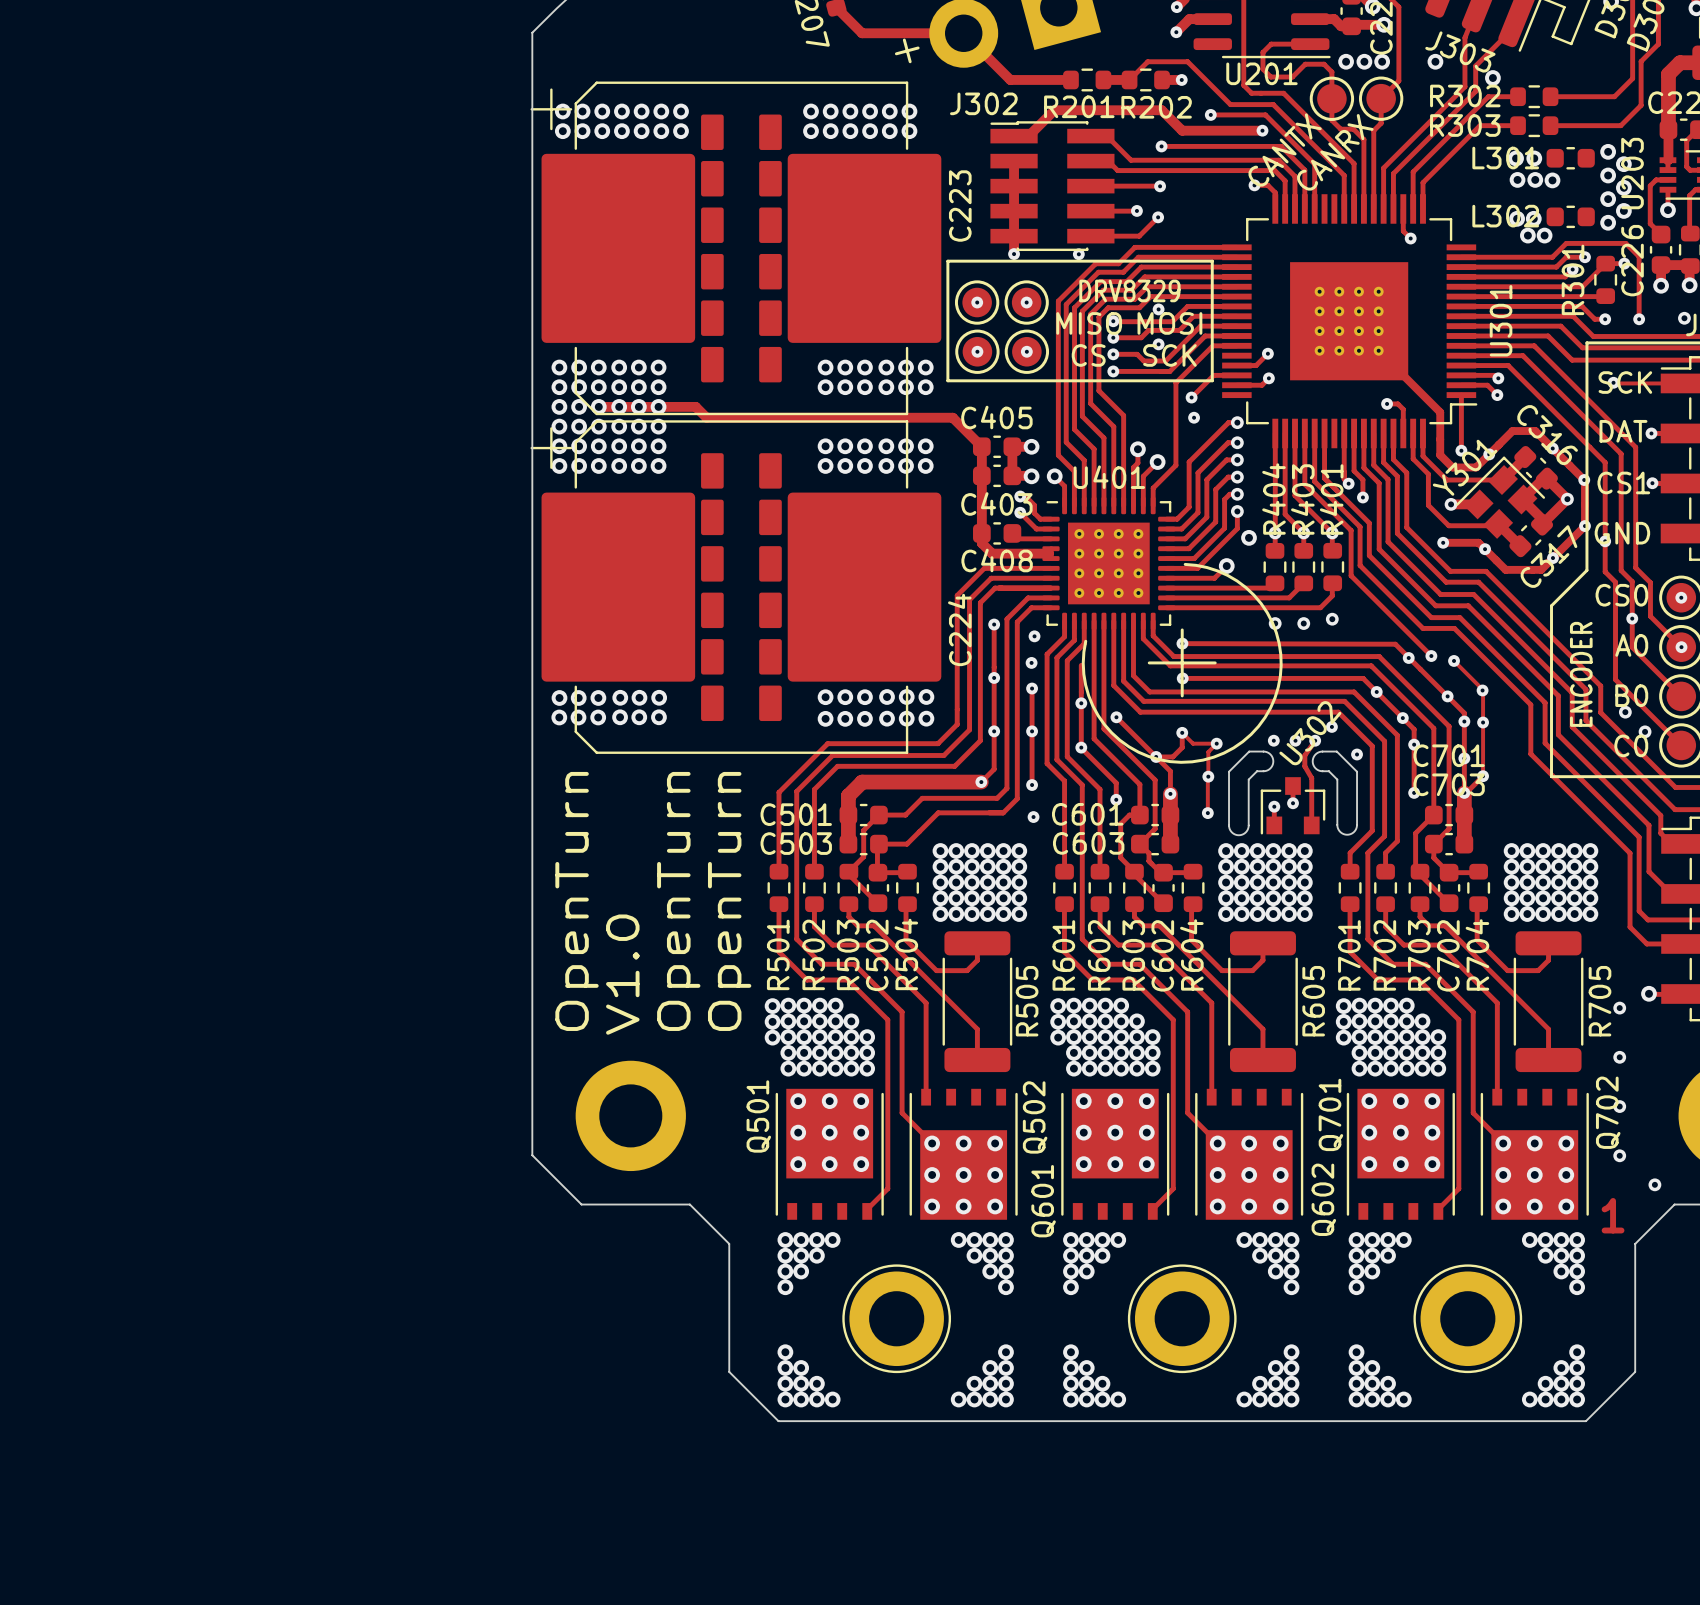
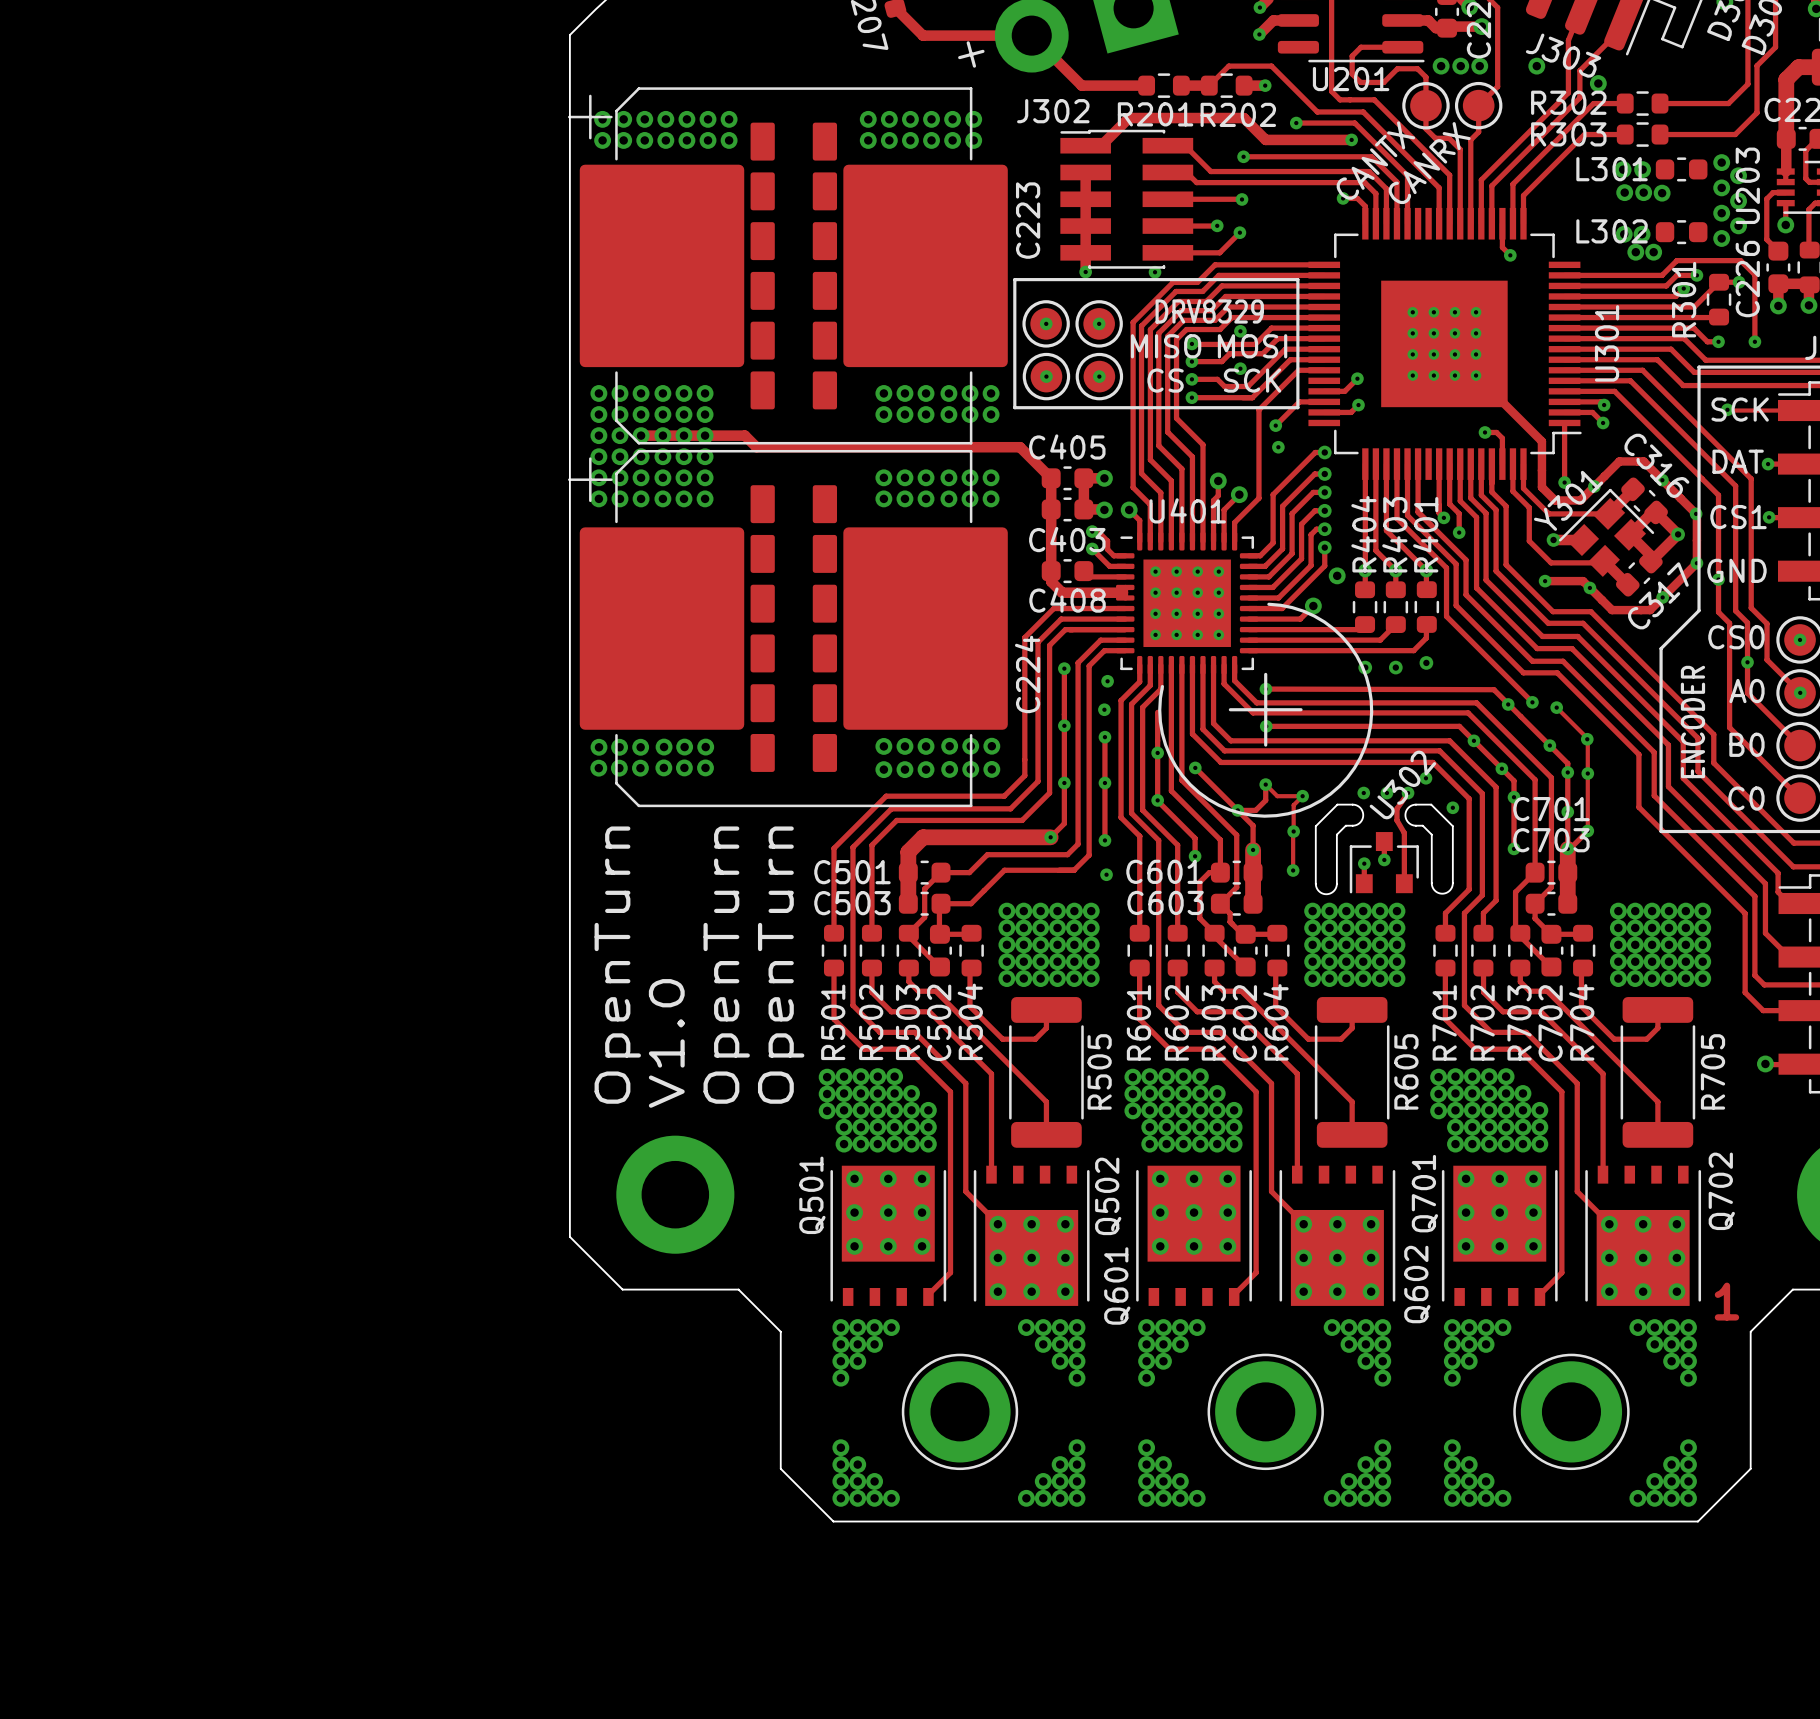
via: (1684, 318) -> none
via: (1625, 712) -> none
via: (1645, 731) -> none
via: (1619, 1008) -> none
via: (1619, 1057) -> none
via: (1619, 1106) -> none
via: (1619, 1155) -> none
via: (1654, 1184) -> none

